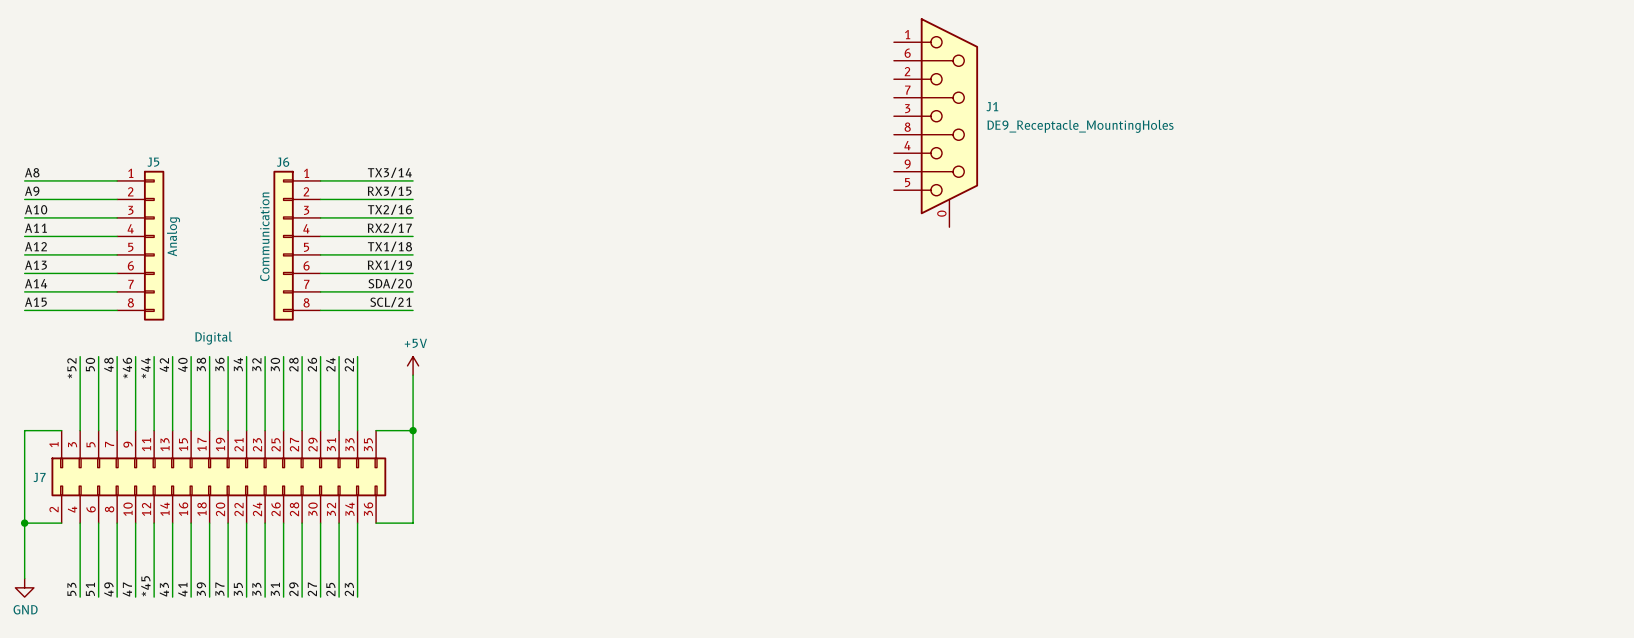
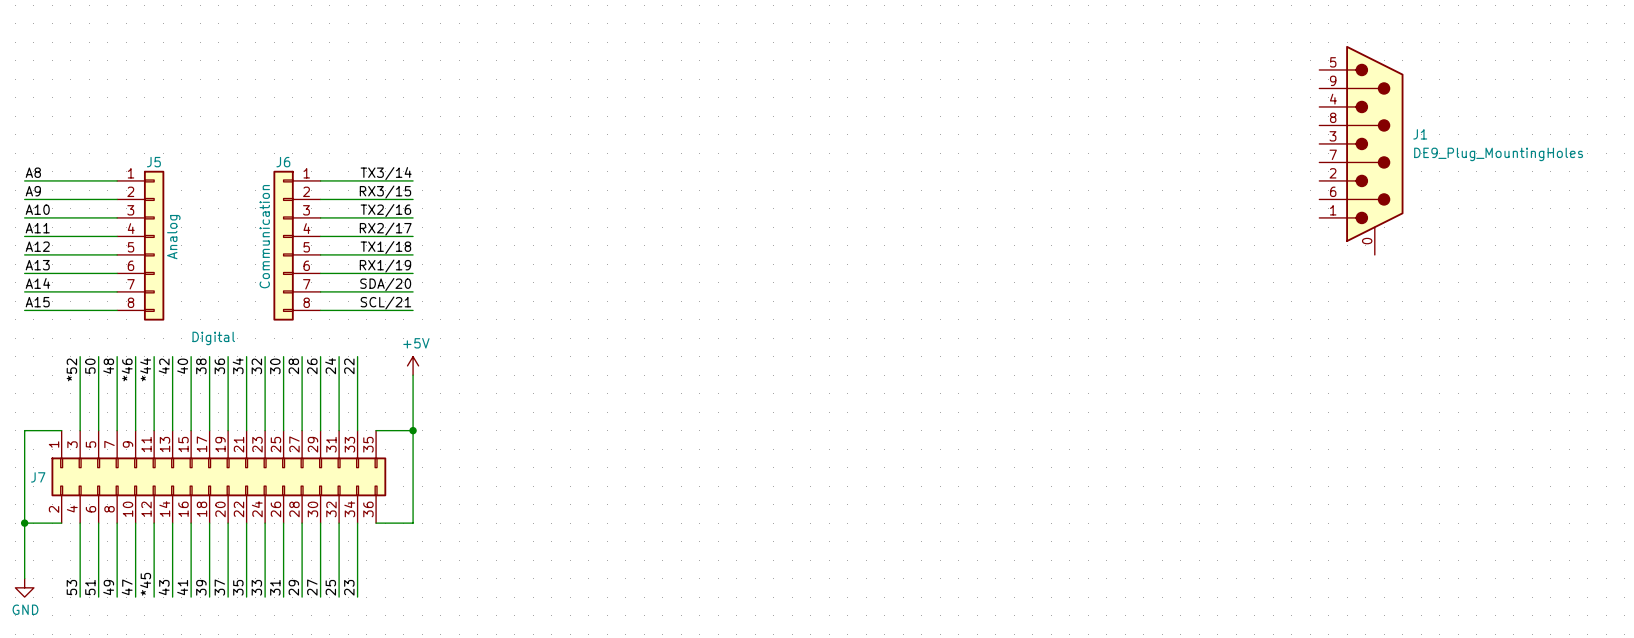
J1 symbol: [893, 18, 979, 228] -> [1319, 45, 1404, 255]
J1 value: DE9_Receptacle_MountingHoles (1080, 126) -> DE9_Plug_MountingHoles (1498, 154)

